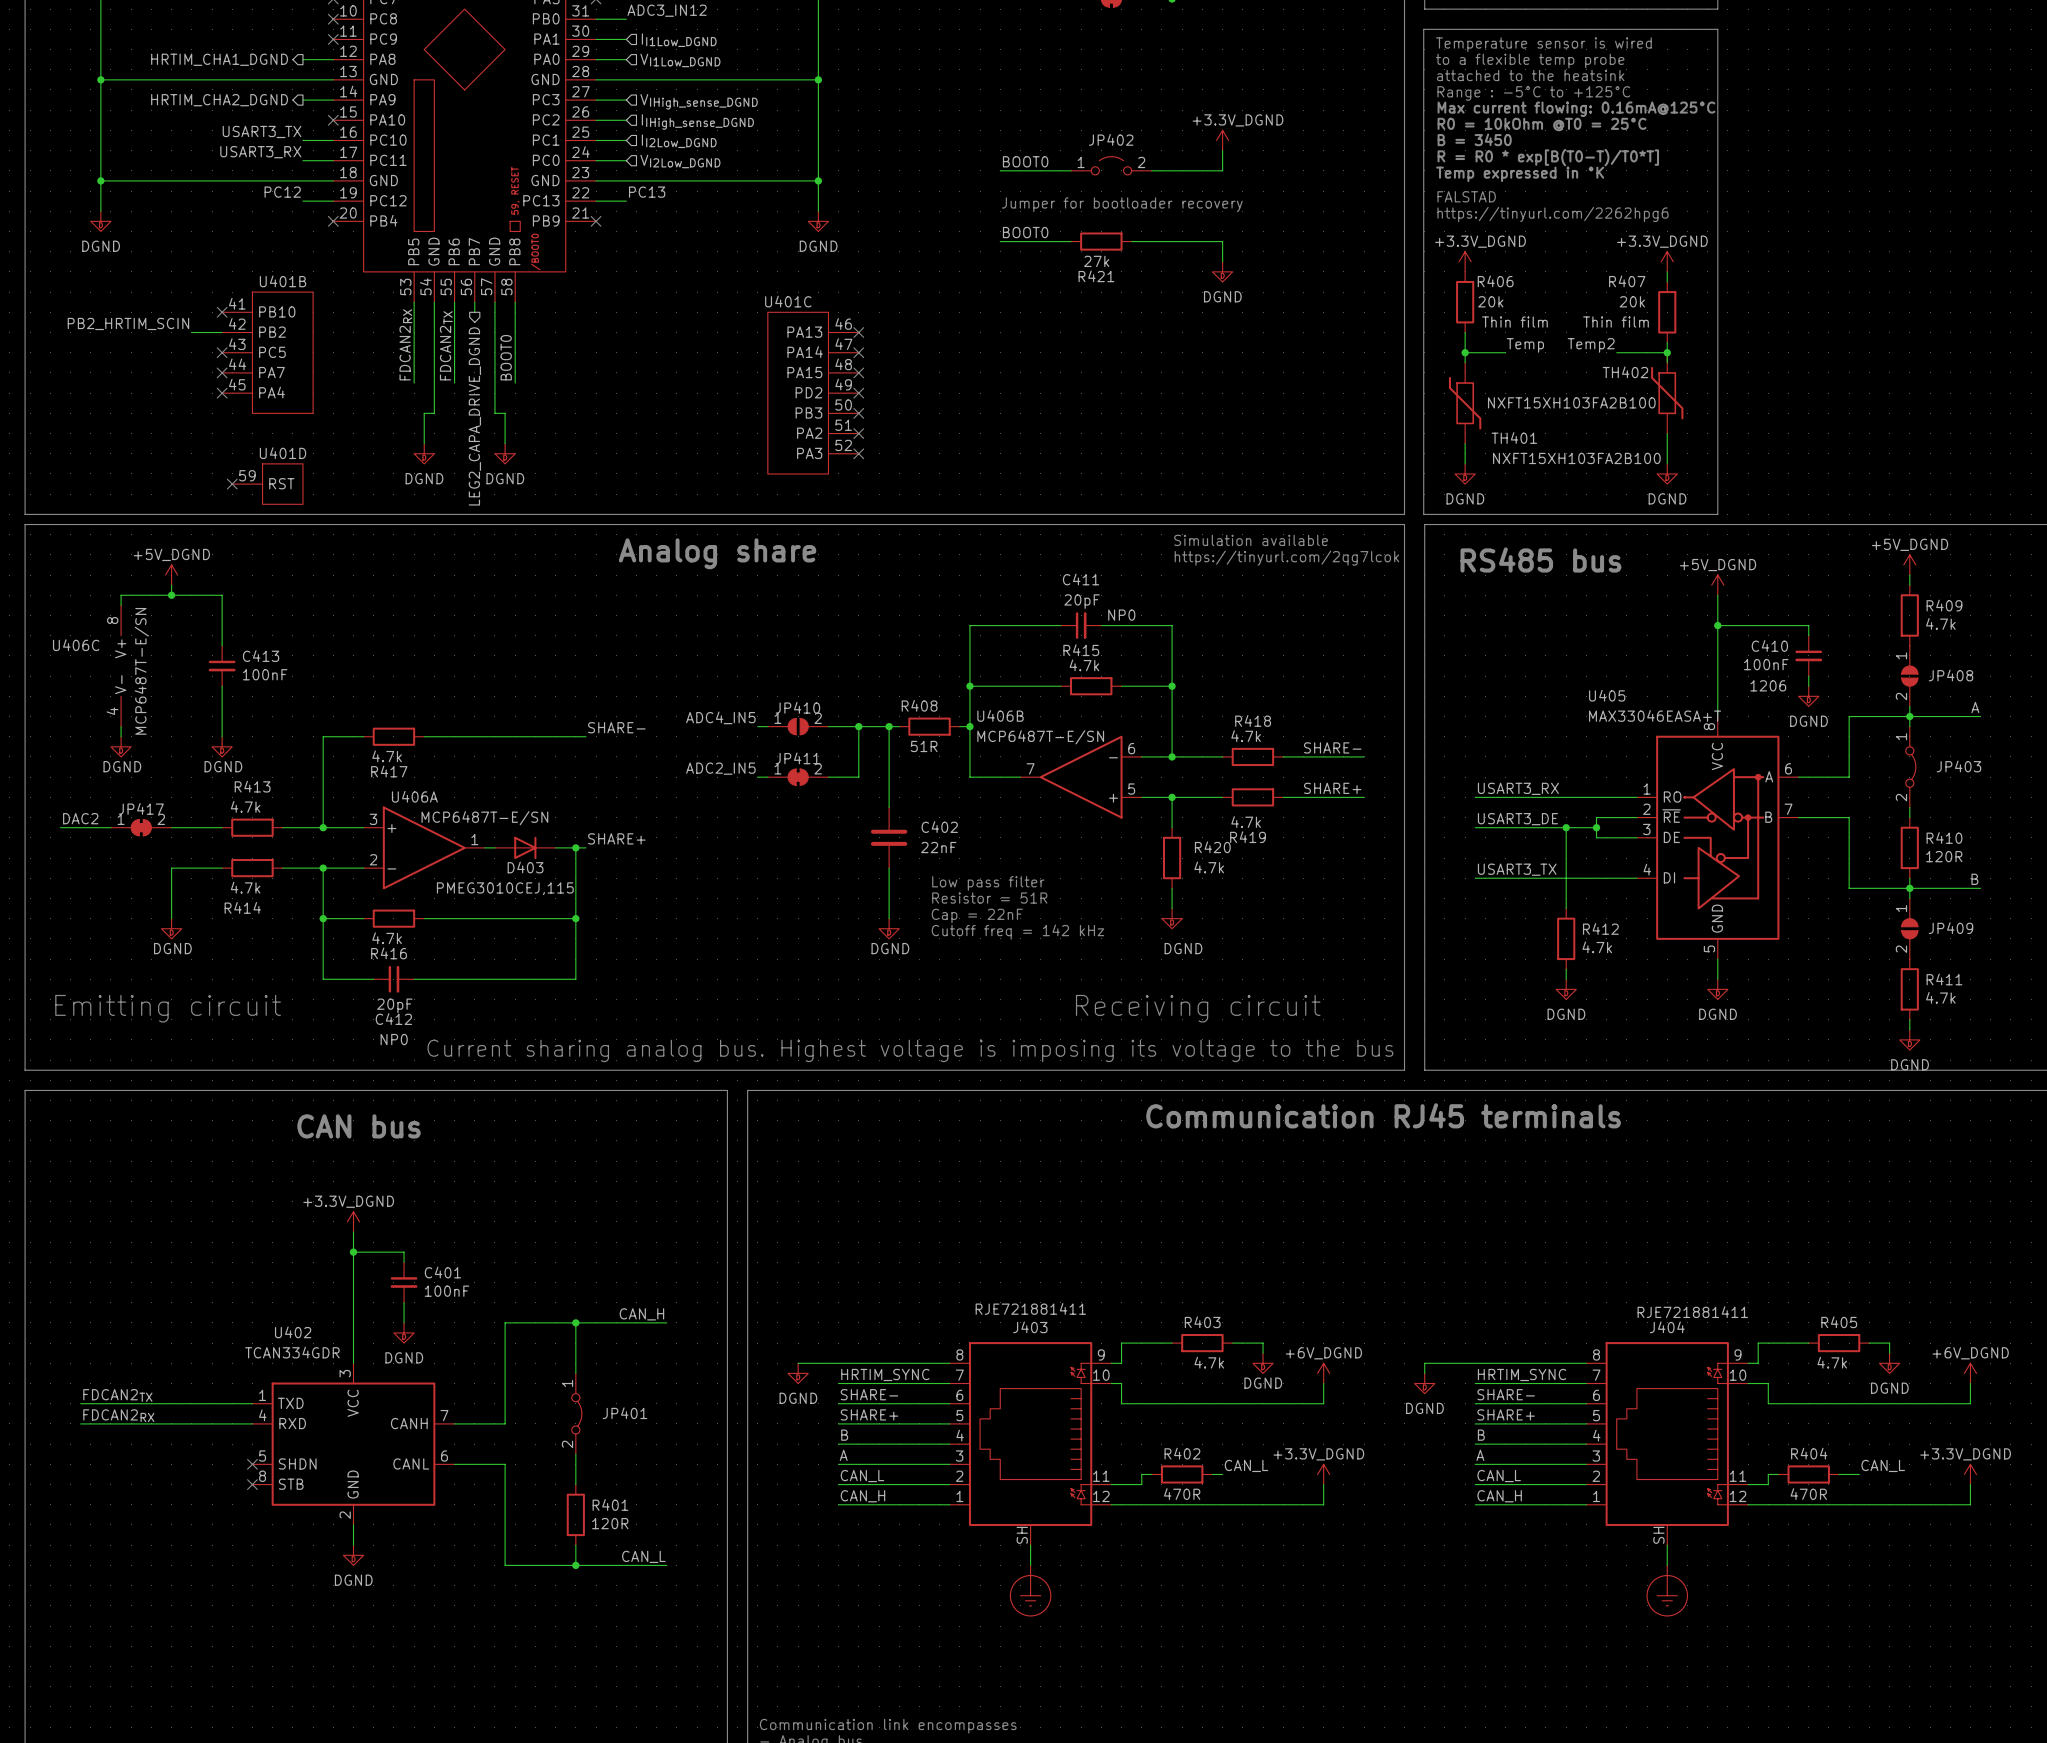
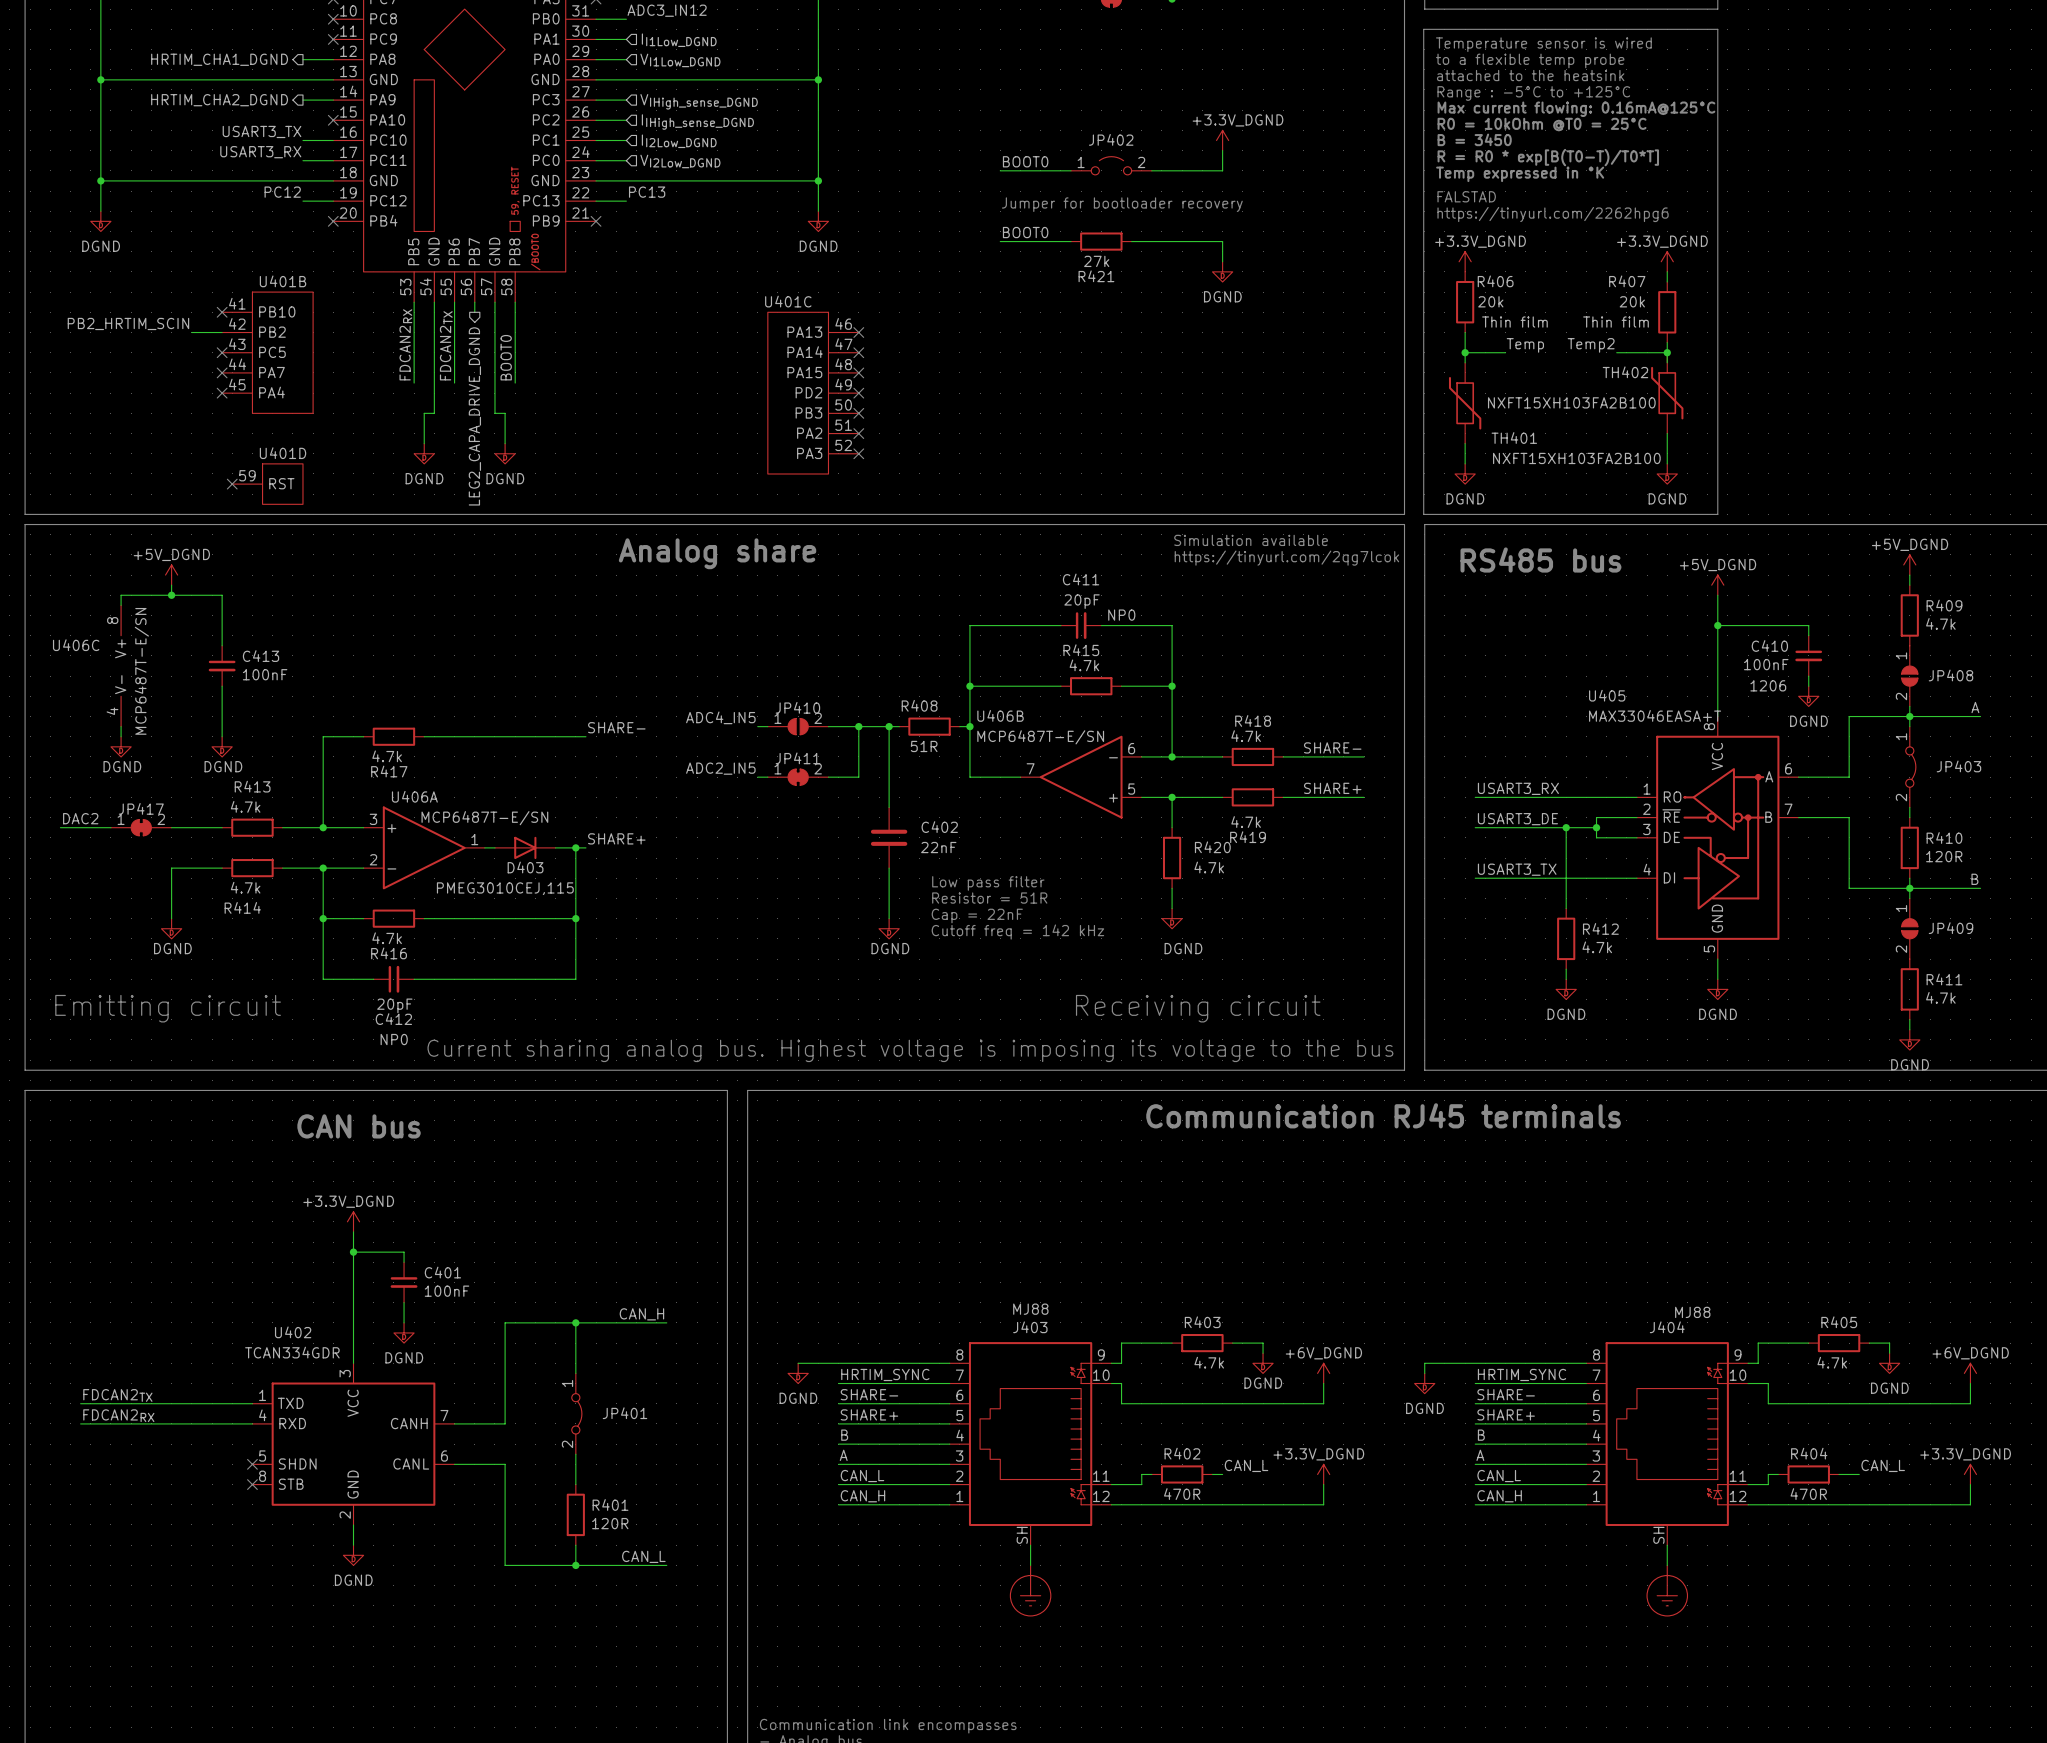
J403 value: RJE721881411 (1030, 1308) -> MJ88 (1030, 1309)
J404 value: RJE721881411 (1692, 1312) -> MJ88 (1692, 1312)

